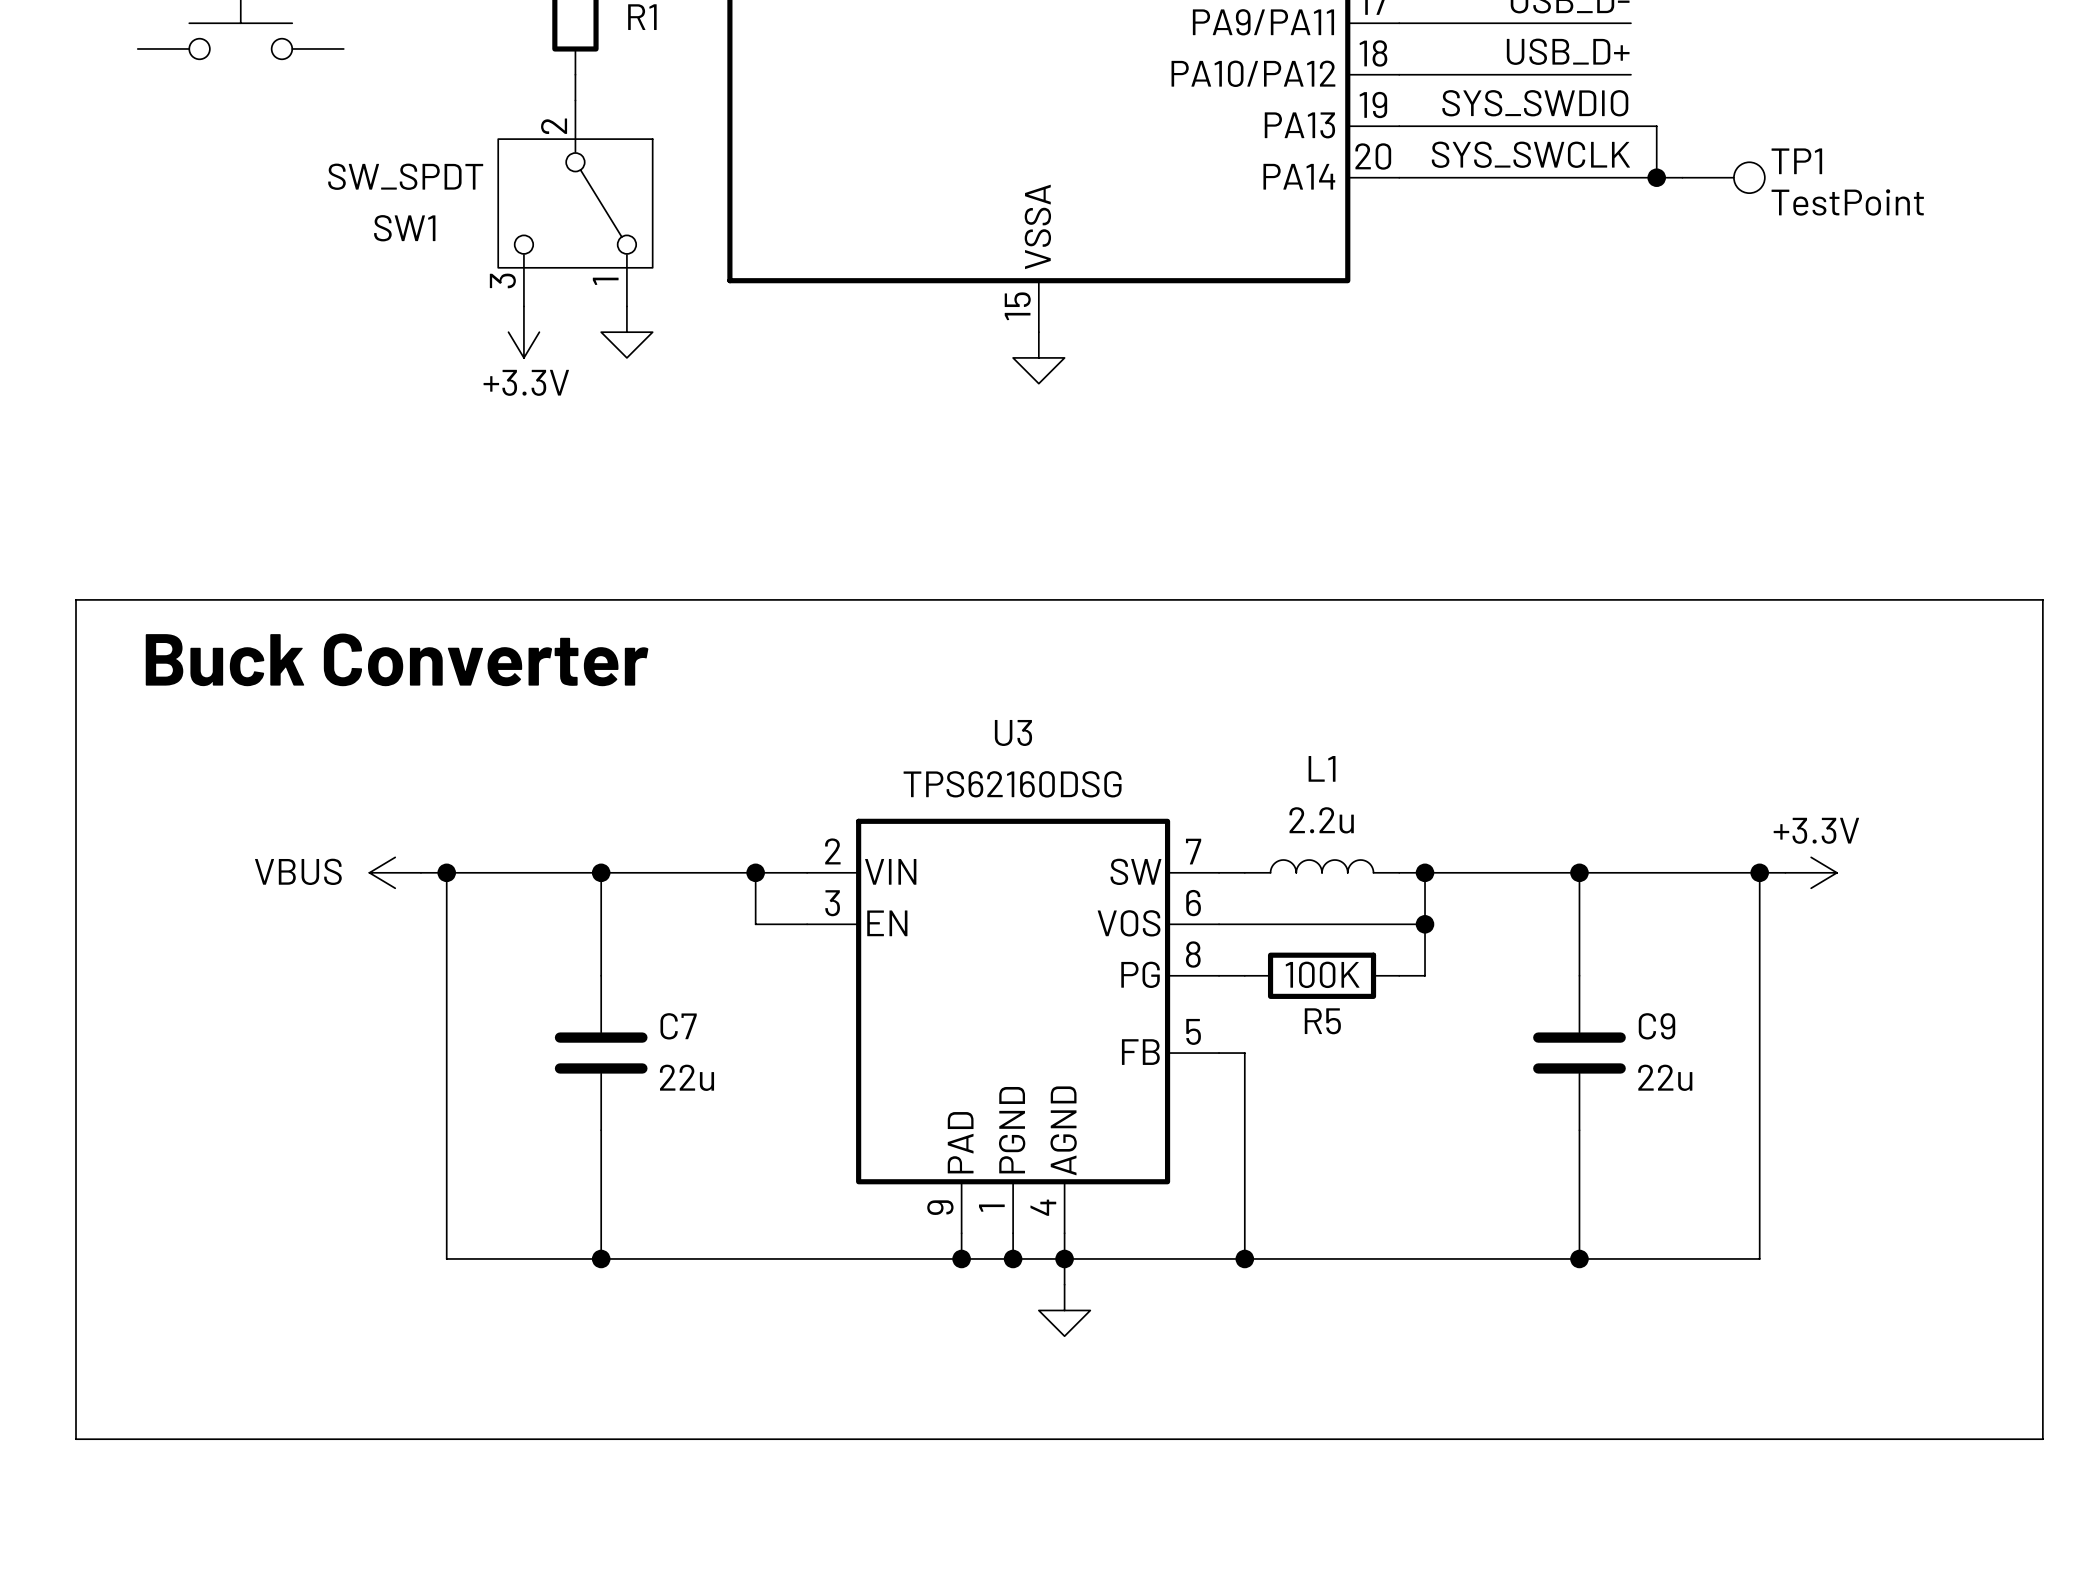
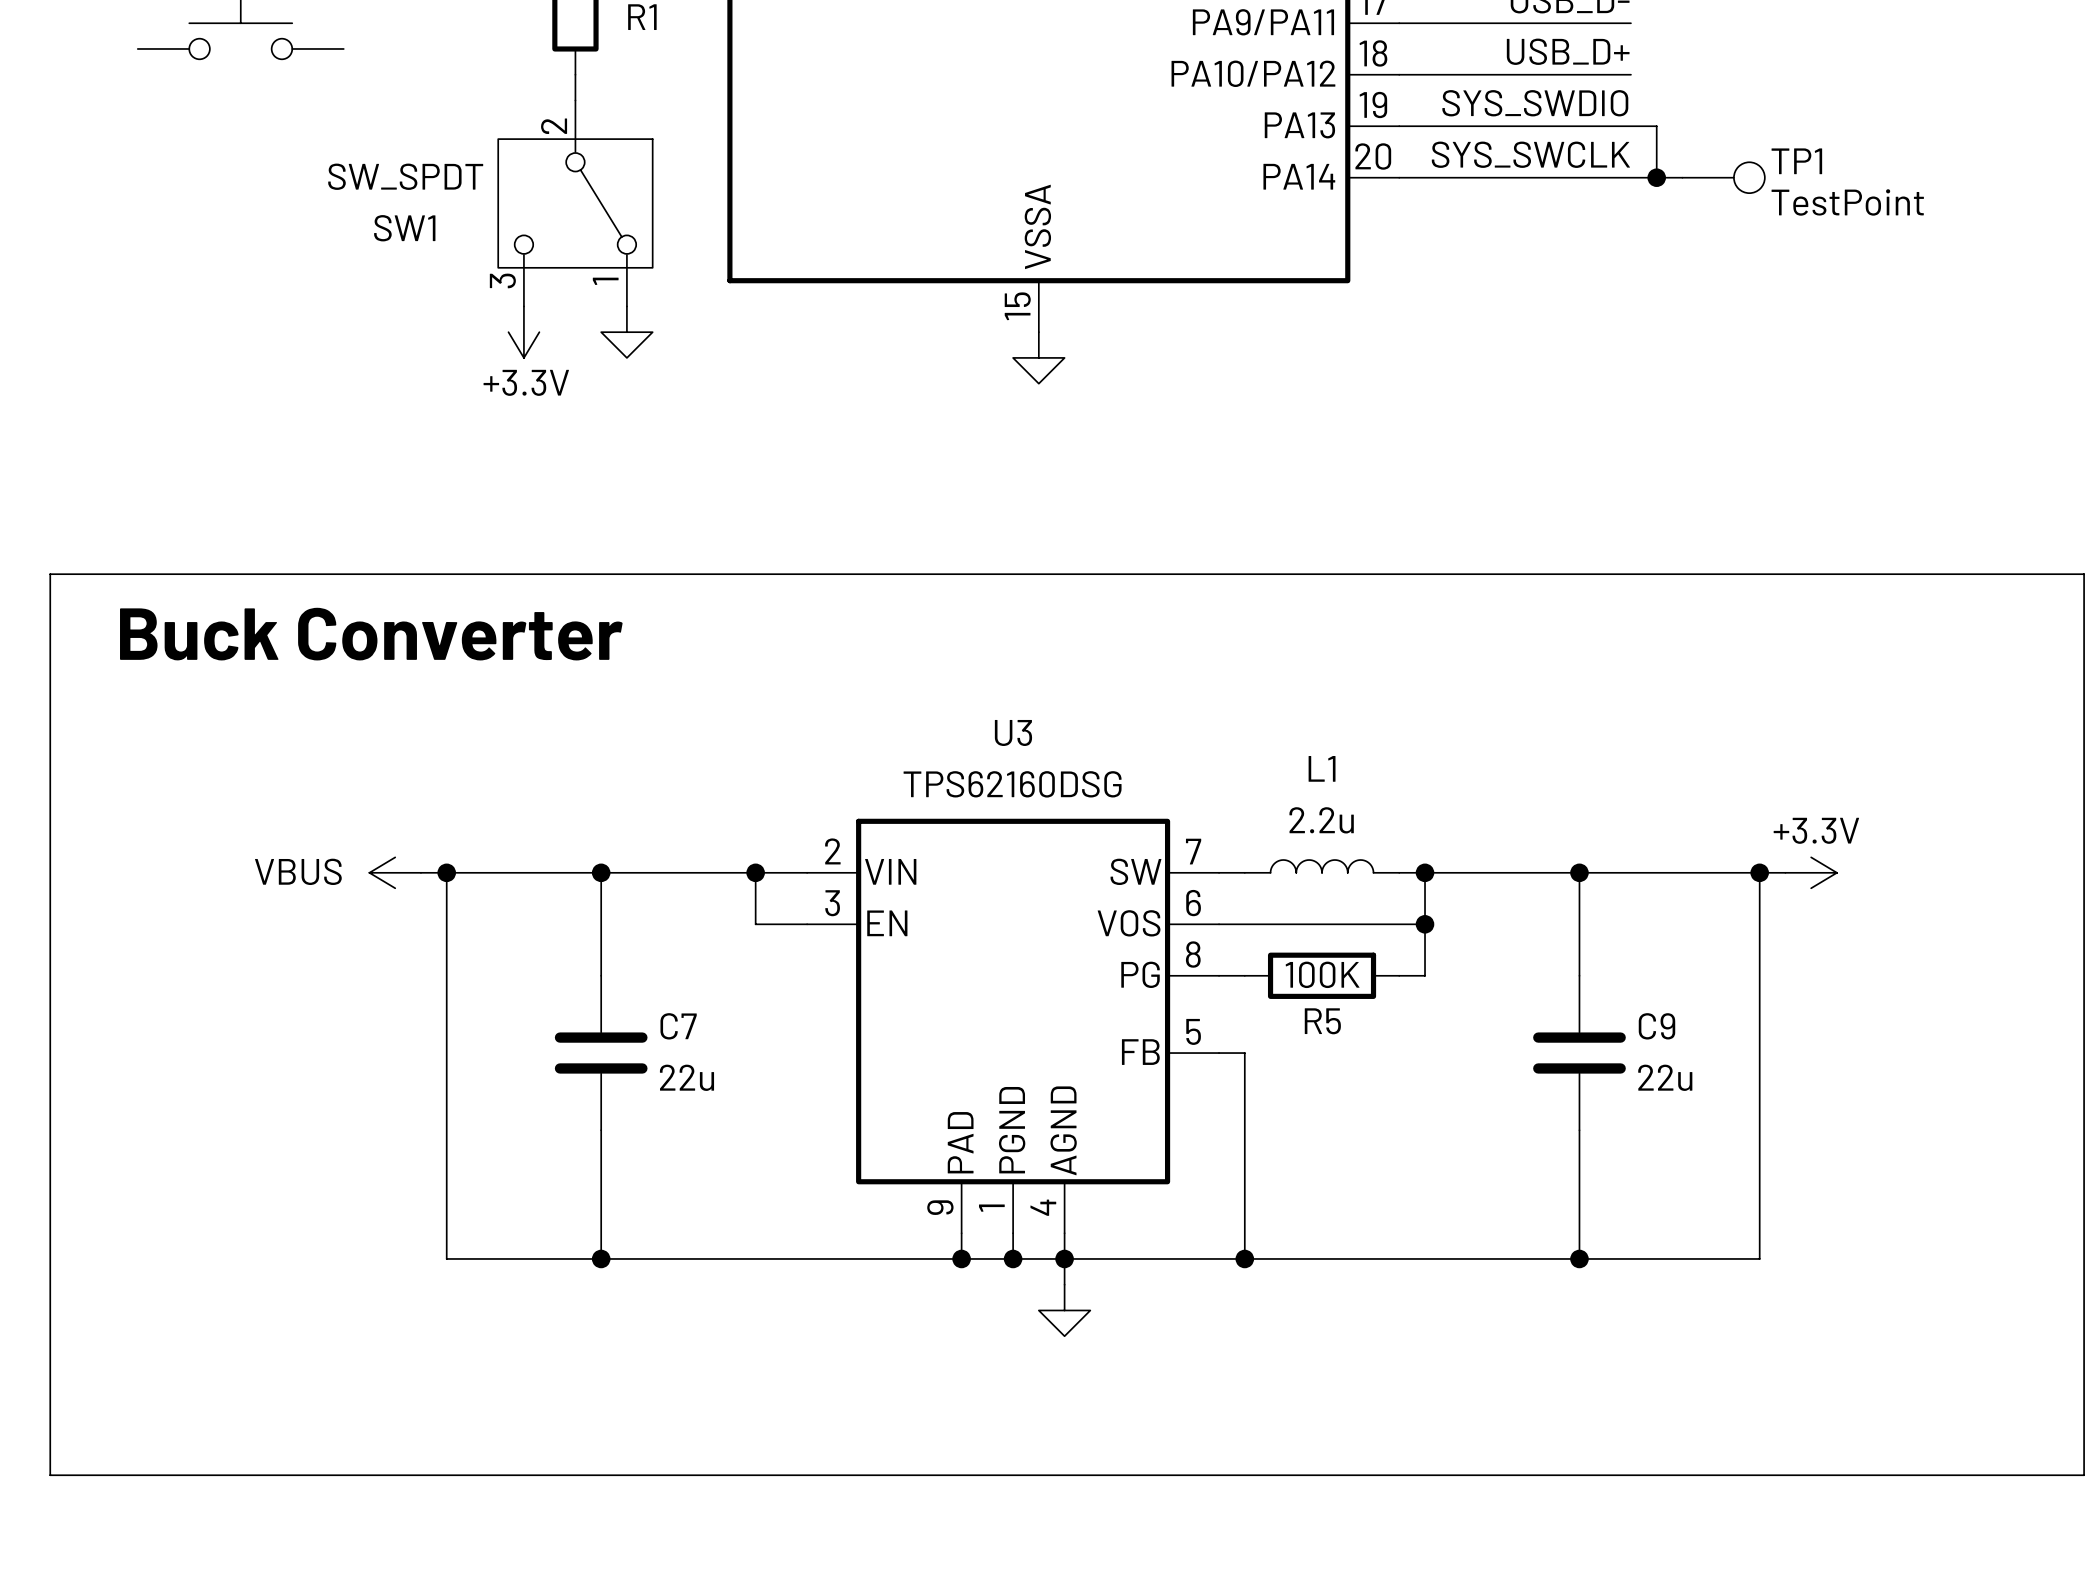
line: (75, 599) (2042, 599) (2042, 1439) (75, 1439) (75, 599) -> (50, 574) (50, 1475) (2084, 1475) (2084, 574) (50, 574)
text position: Buck Converter (397, 659) -> Buck Converter (371, 634)

